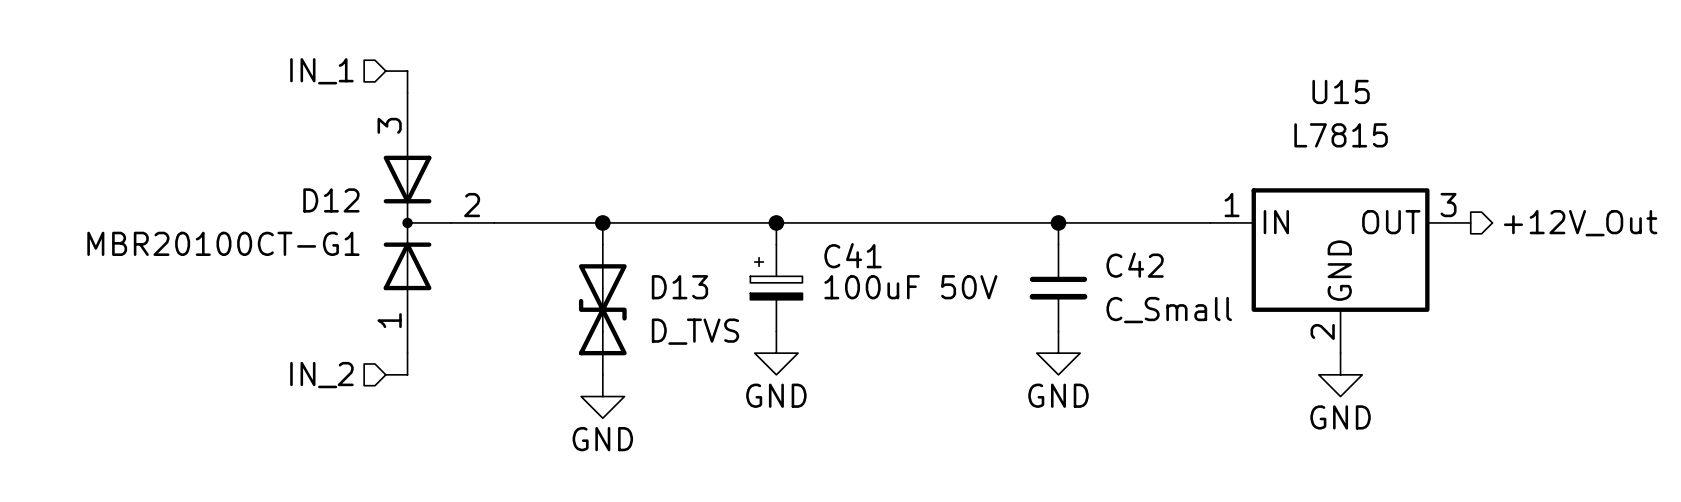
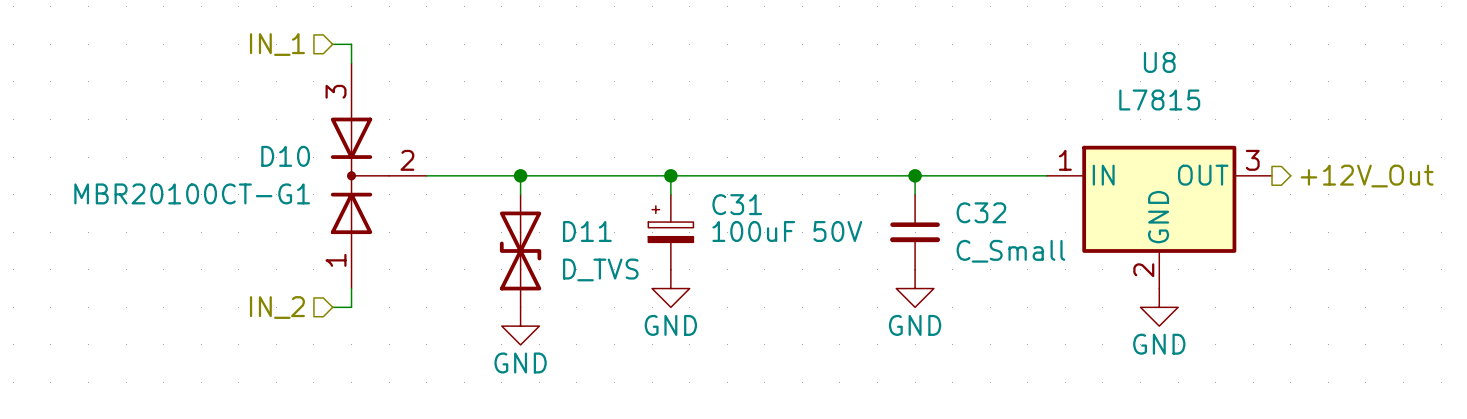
U15 name: U15 (1341, 91) -> U8 (1159, 62)
D12 name: D12 (331, 200) -> D10 (285, 156)
C41 name: C41 (853, 255) -> C31 (737, 204)
C42 name: C42 (1135, 265) -> C32 (981, 212)
D13 name: D13 (679, 287) -> D11 (587, 231)

